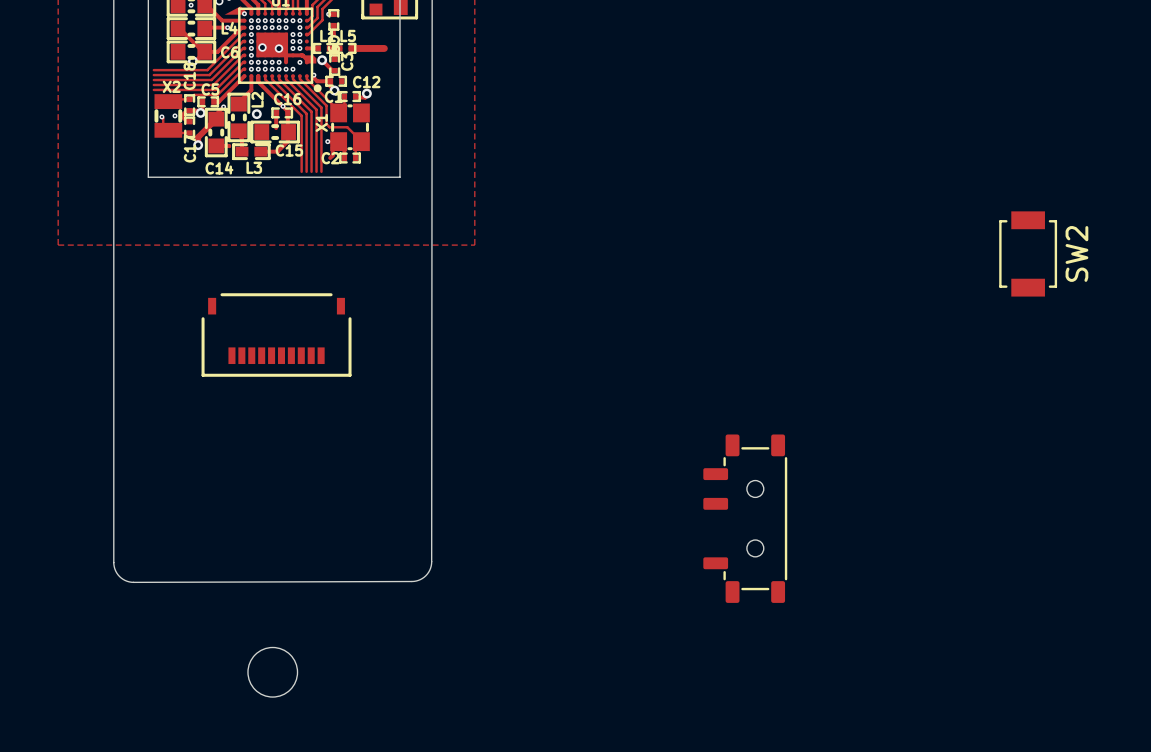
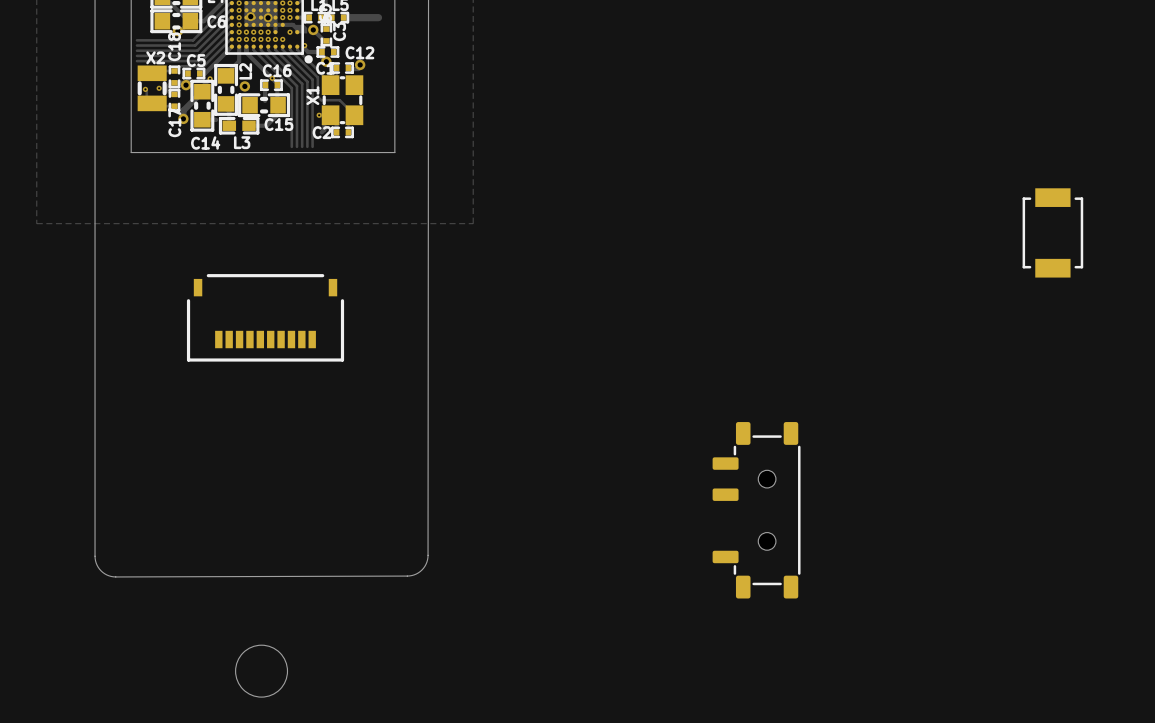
SW2 name: SW2 (1076, 253) -> none

